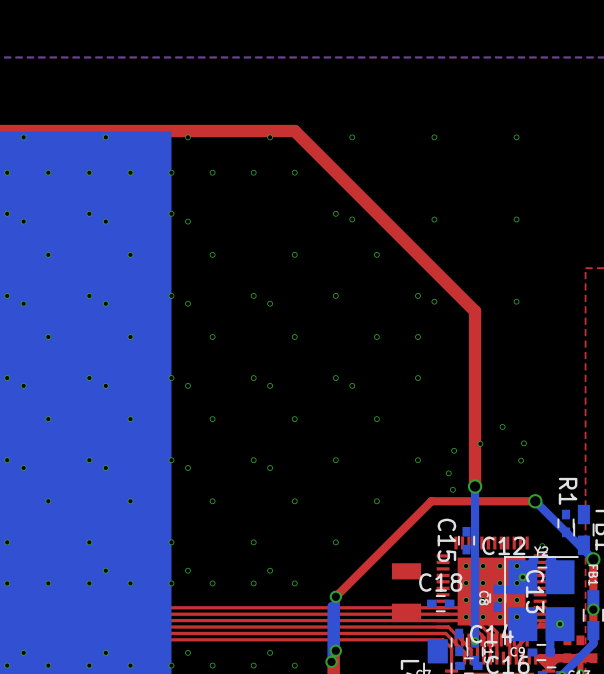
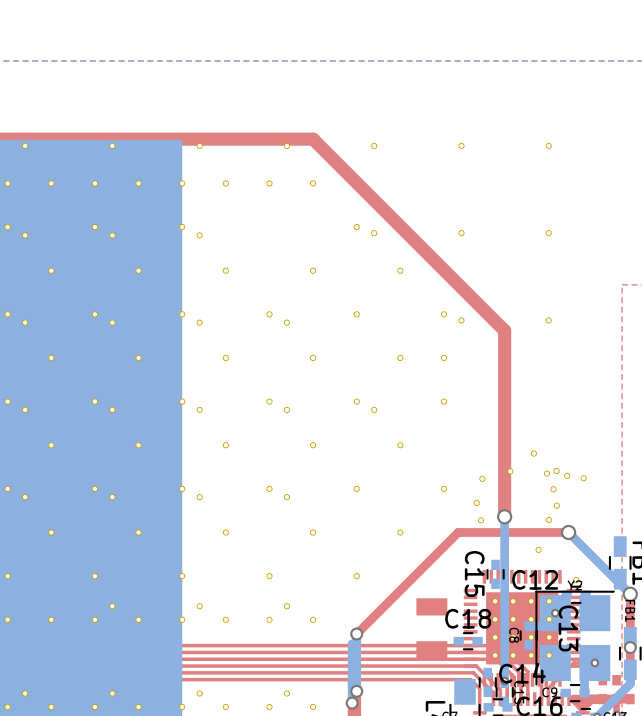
part: none -> (546, 473)
part: none -> (567, 475)
part: none -> (583, 478)
part: none -> (556, 505)
part: none -> (549, 519)
part: none -> (538, 549)
R1: (566, 523) -> none

